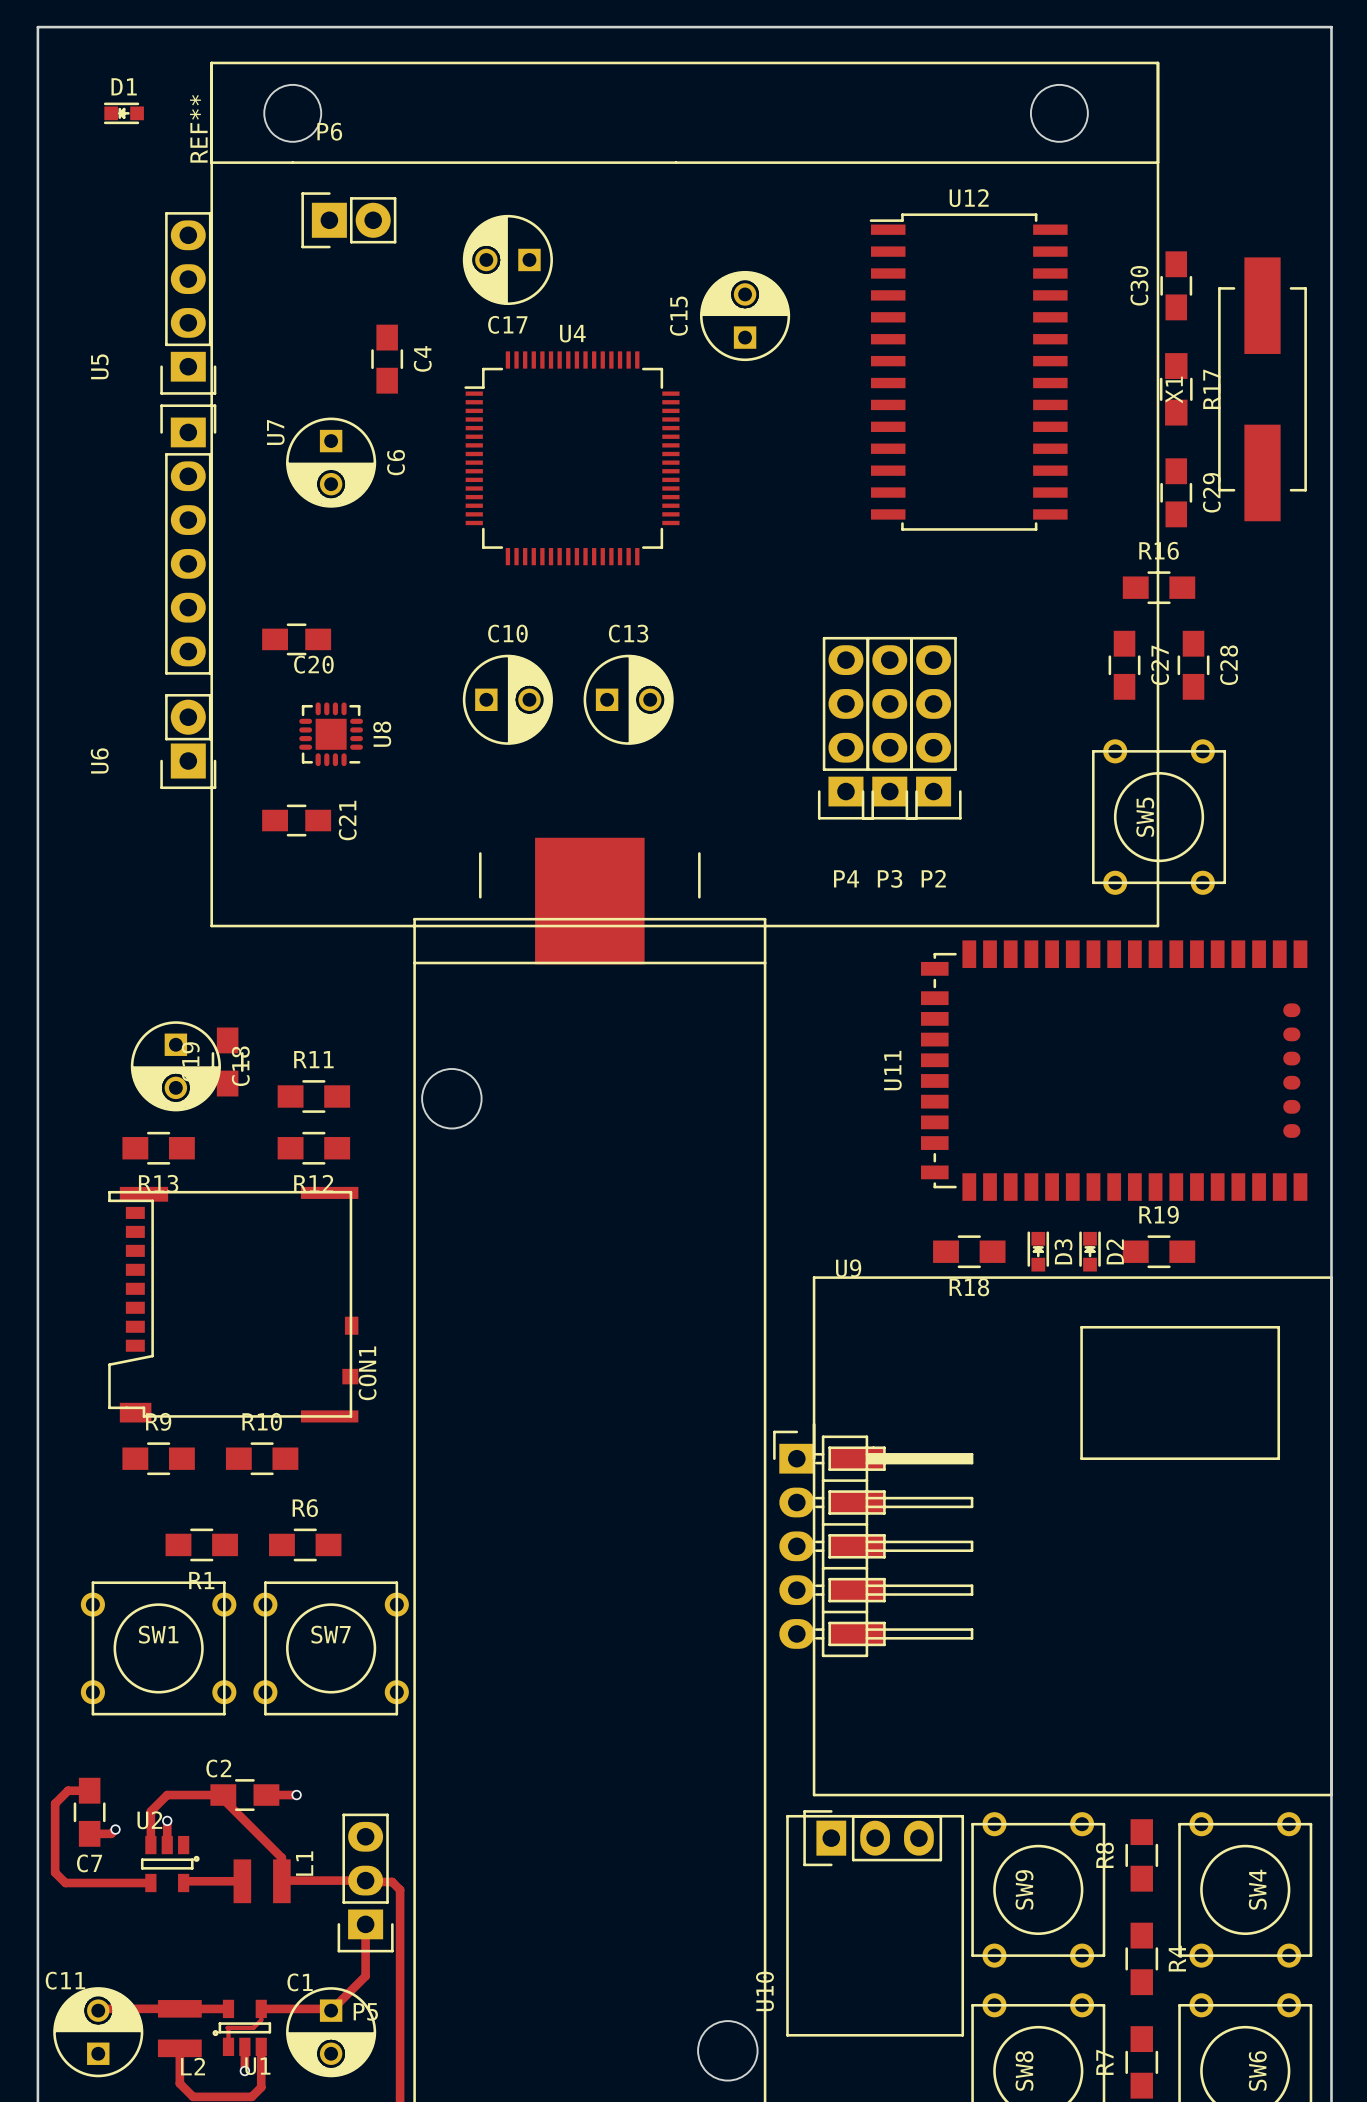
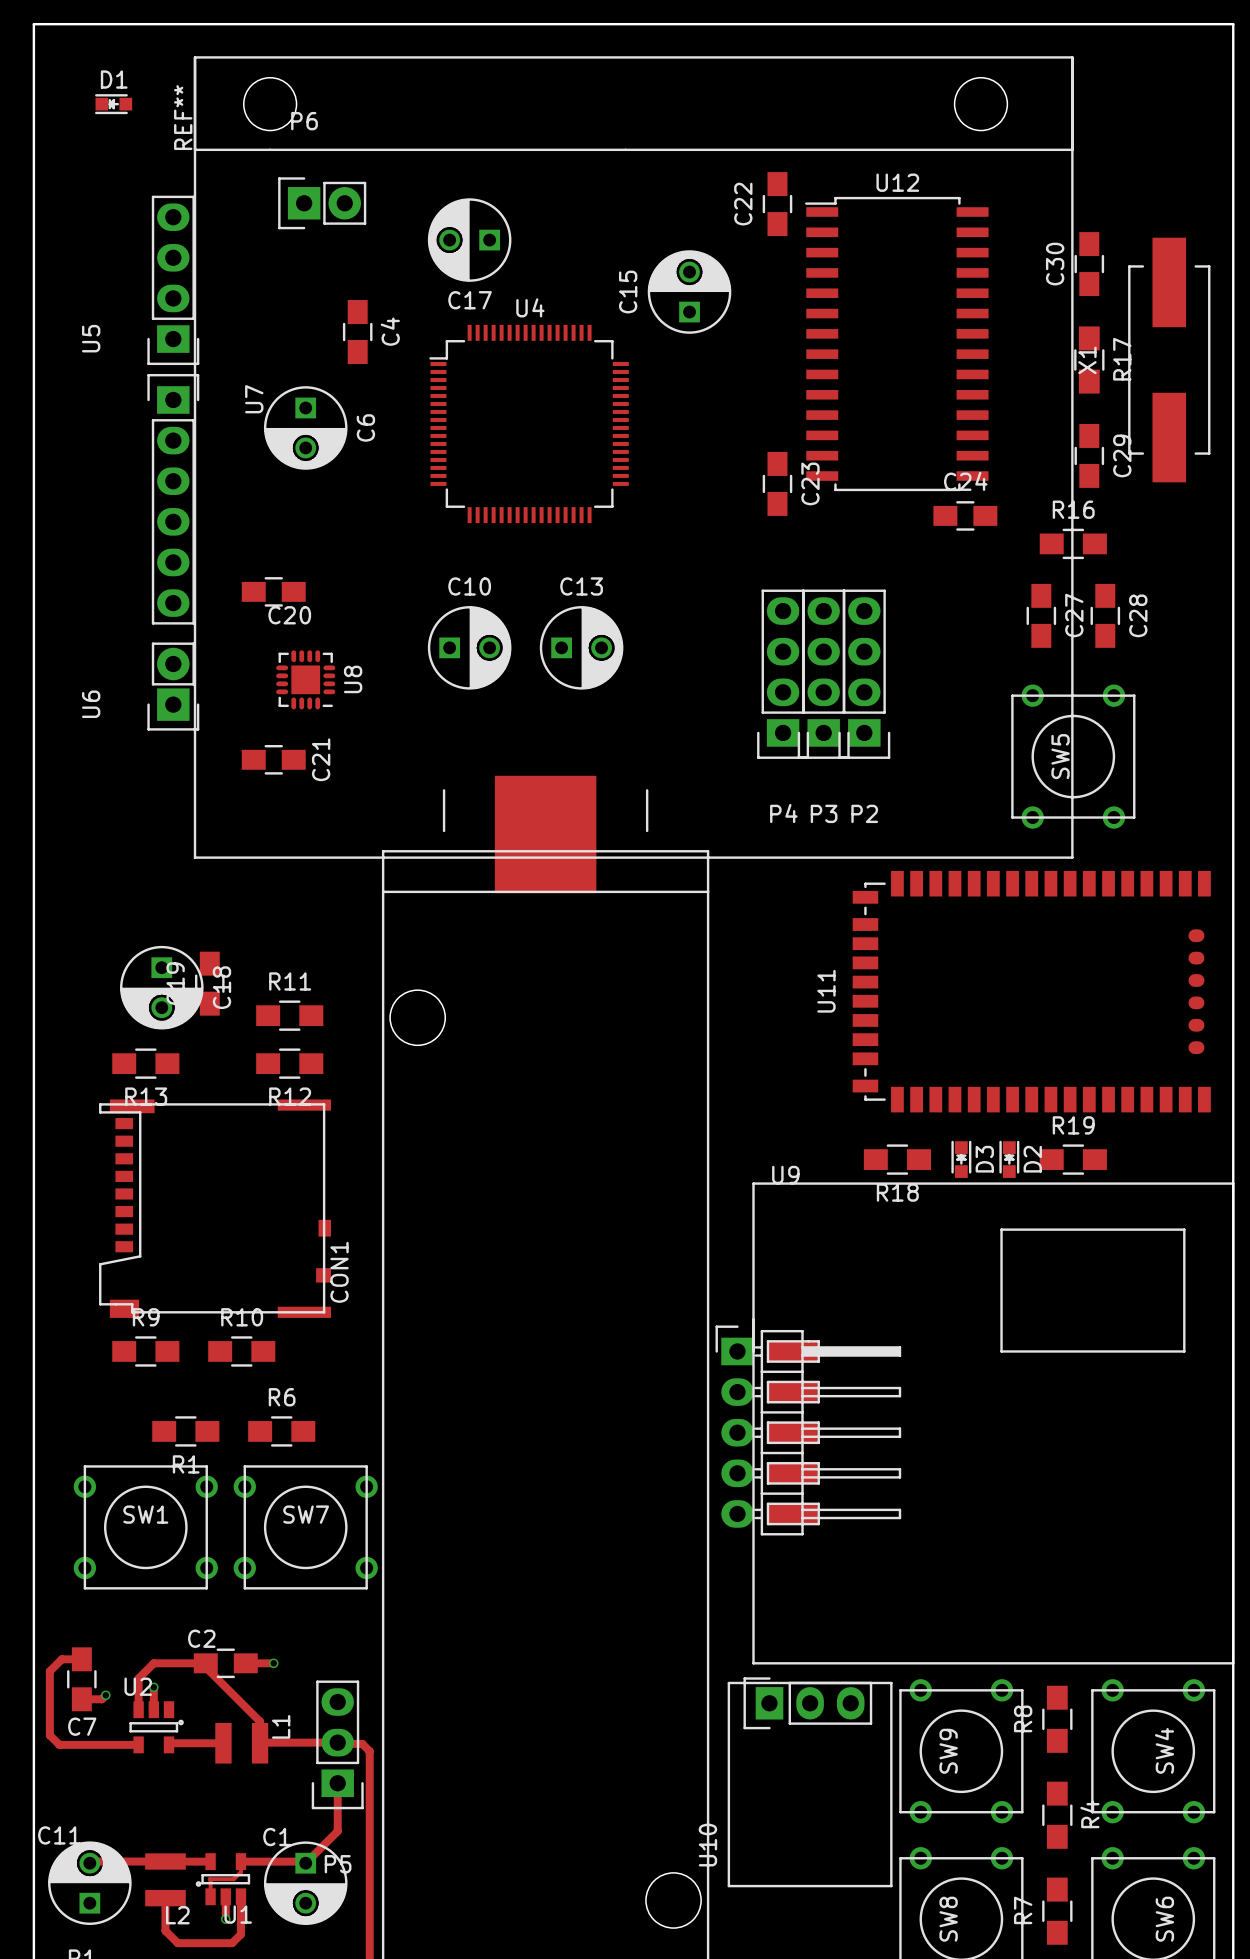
C22: none -> (777, 204)
C23: none -> (777, 483)
C24: none -> (965, 515)

